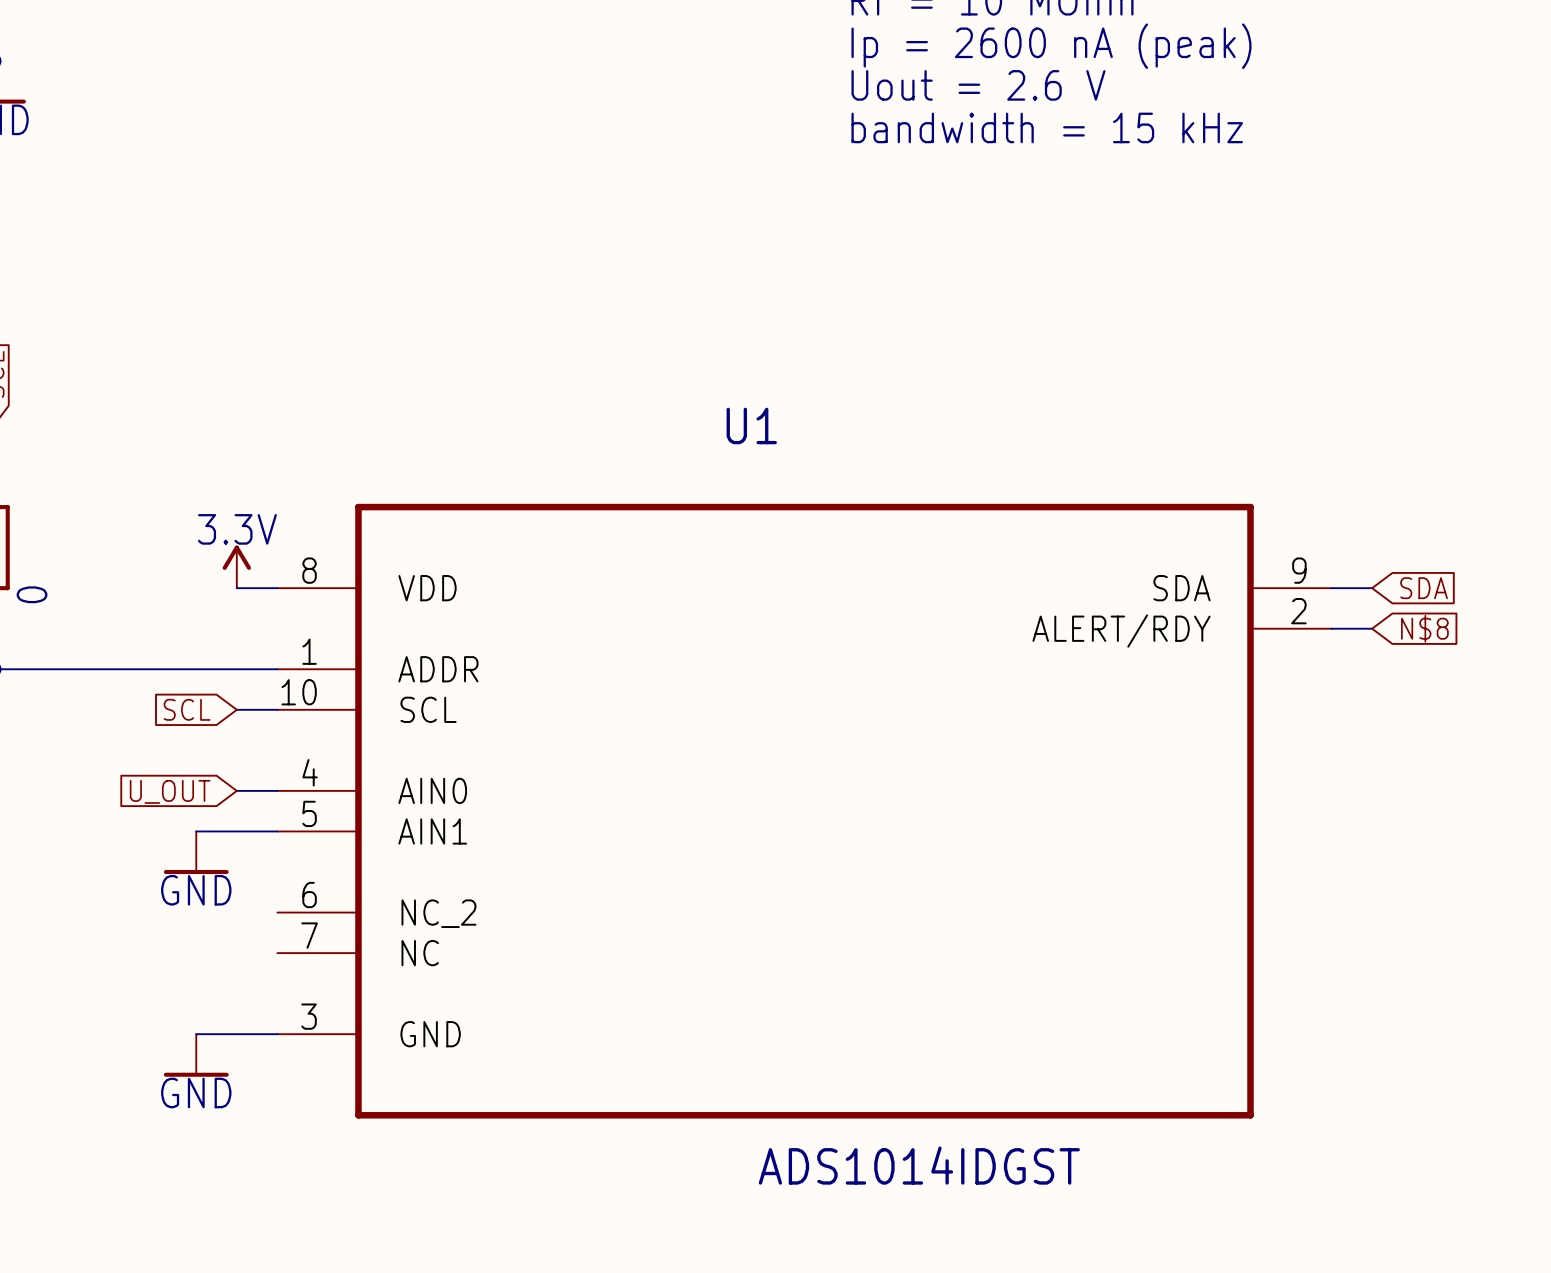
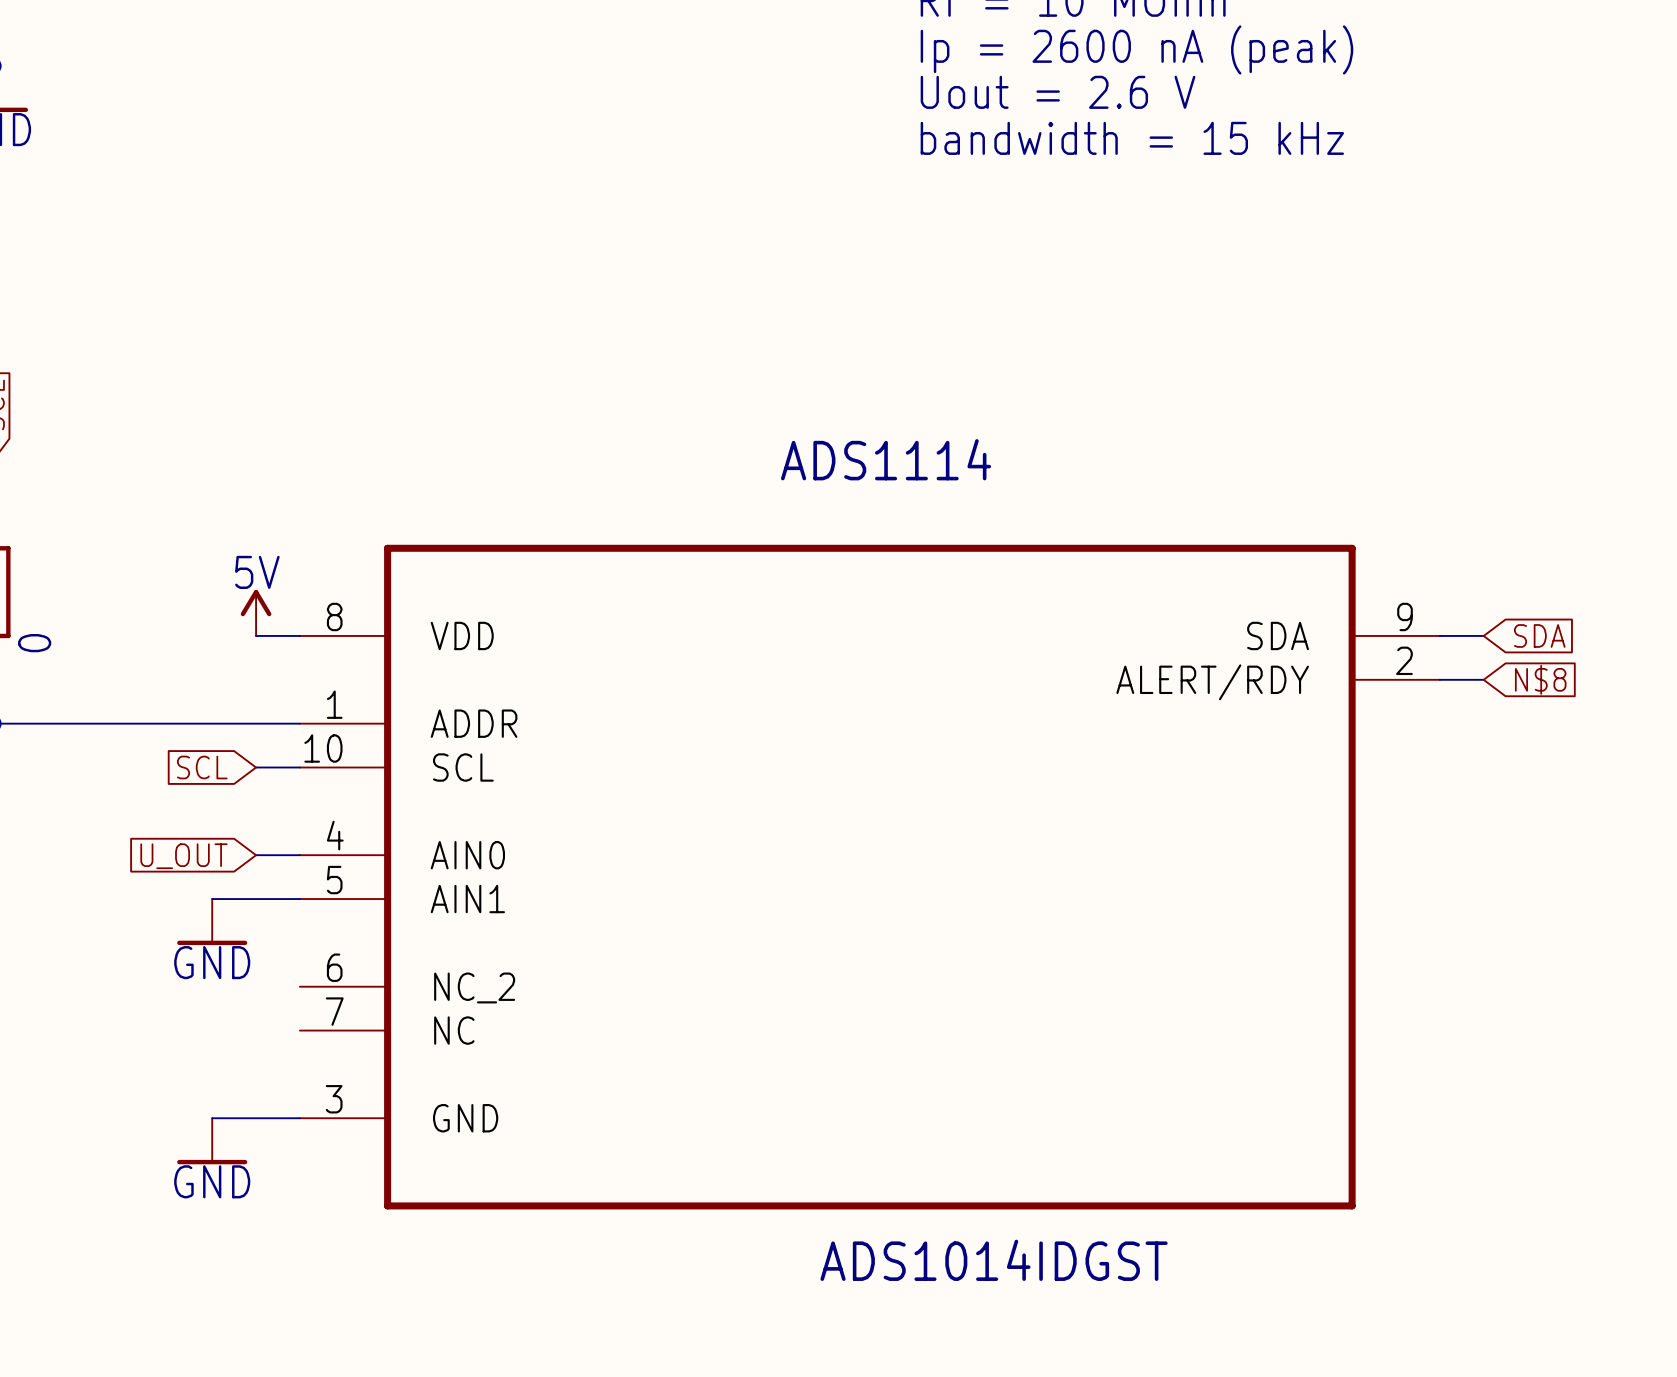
U1 name: U1 (751, 425) -> ADS1114 (886, 459)
power symbol: 3.3V (236, 566) -> 5V (256, 612)

